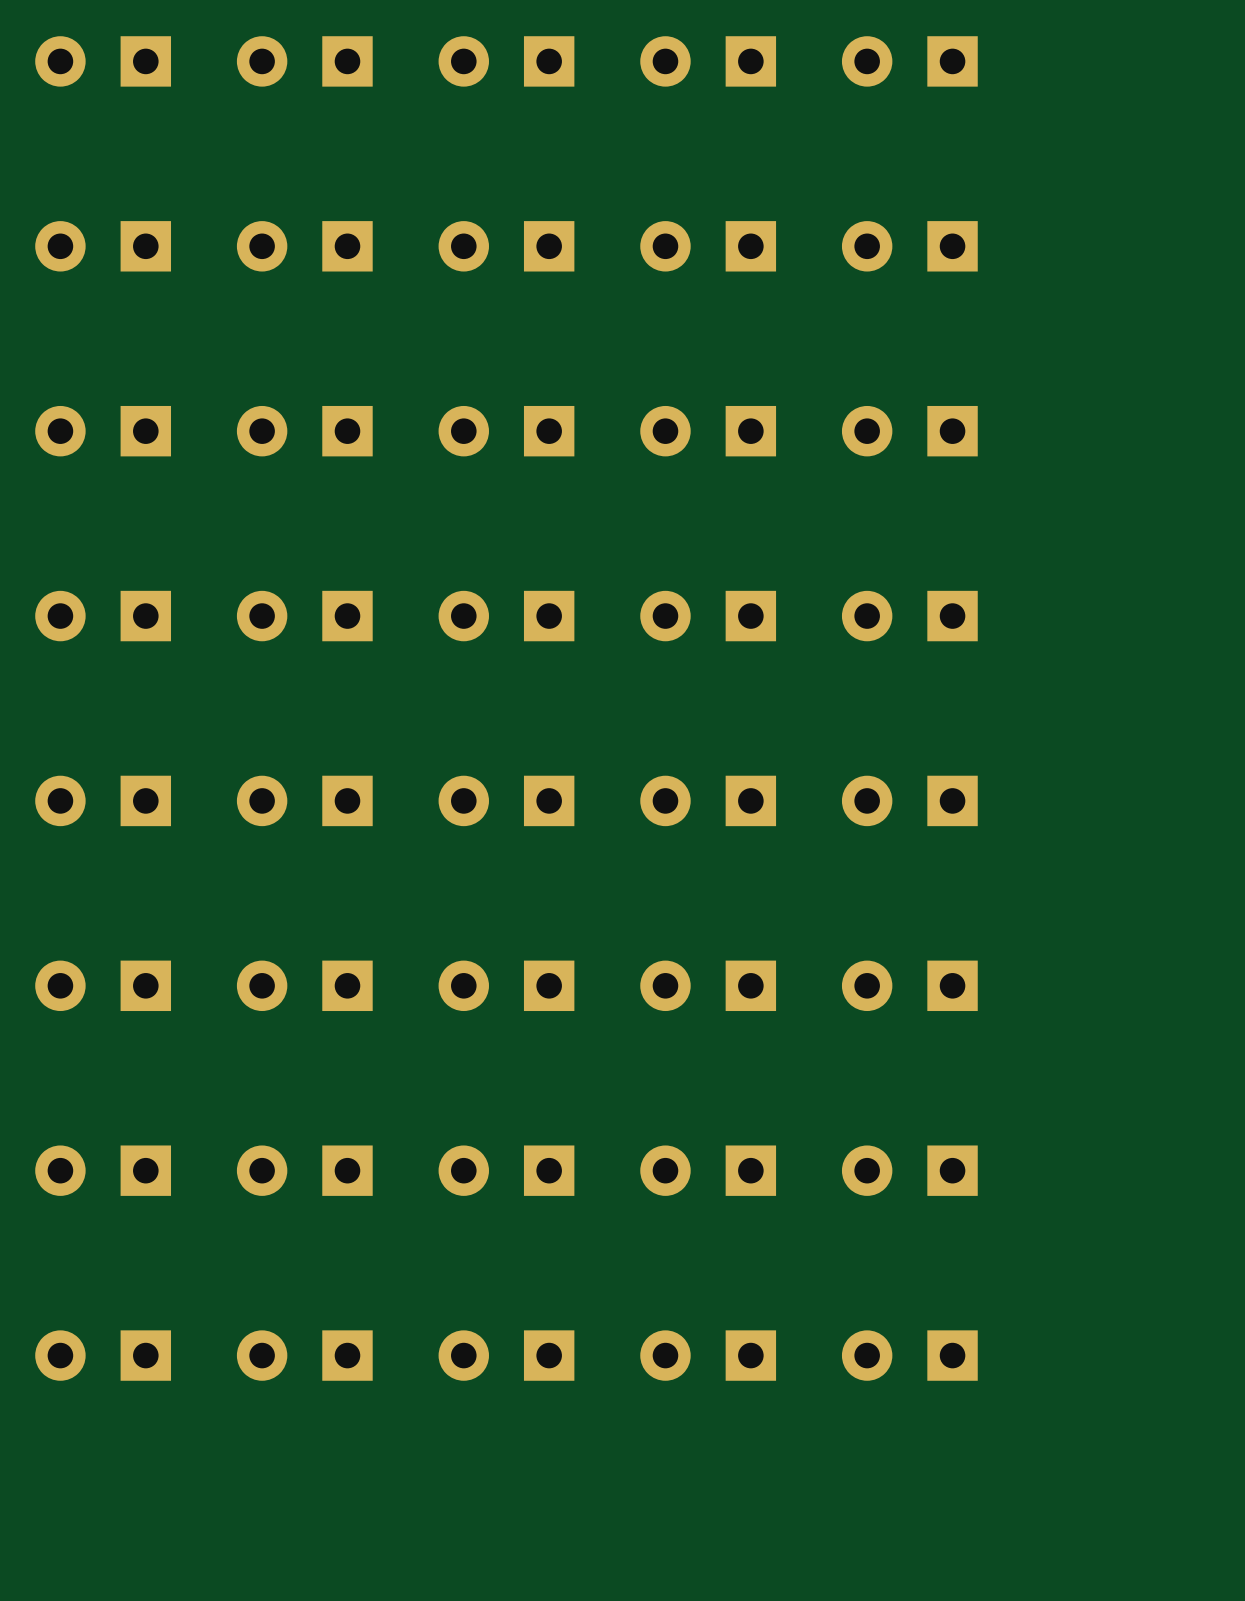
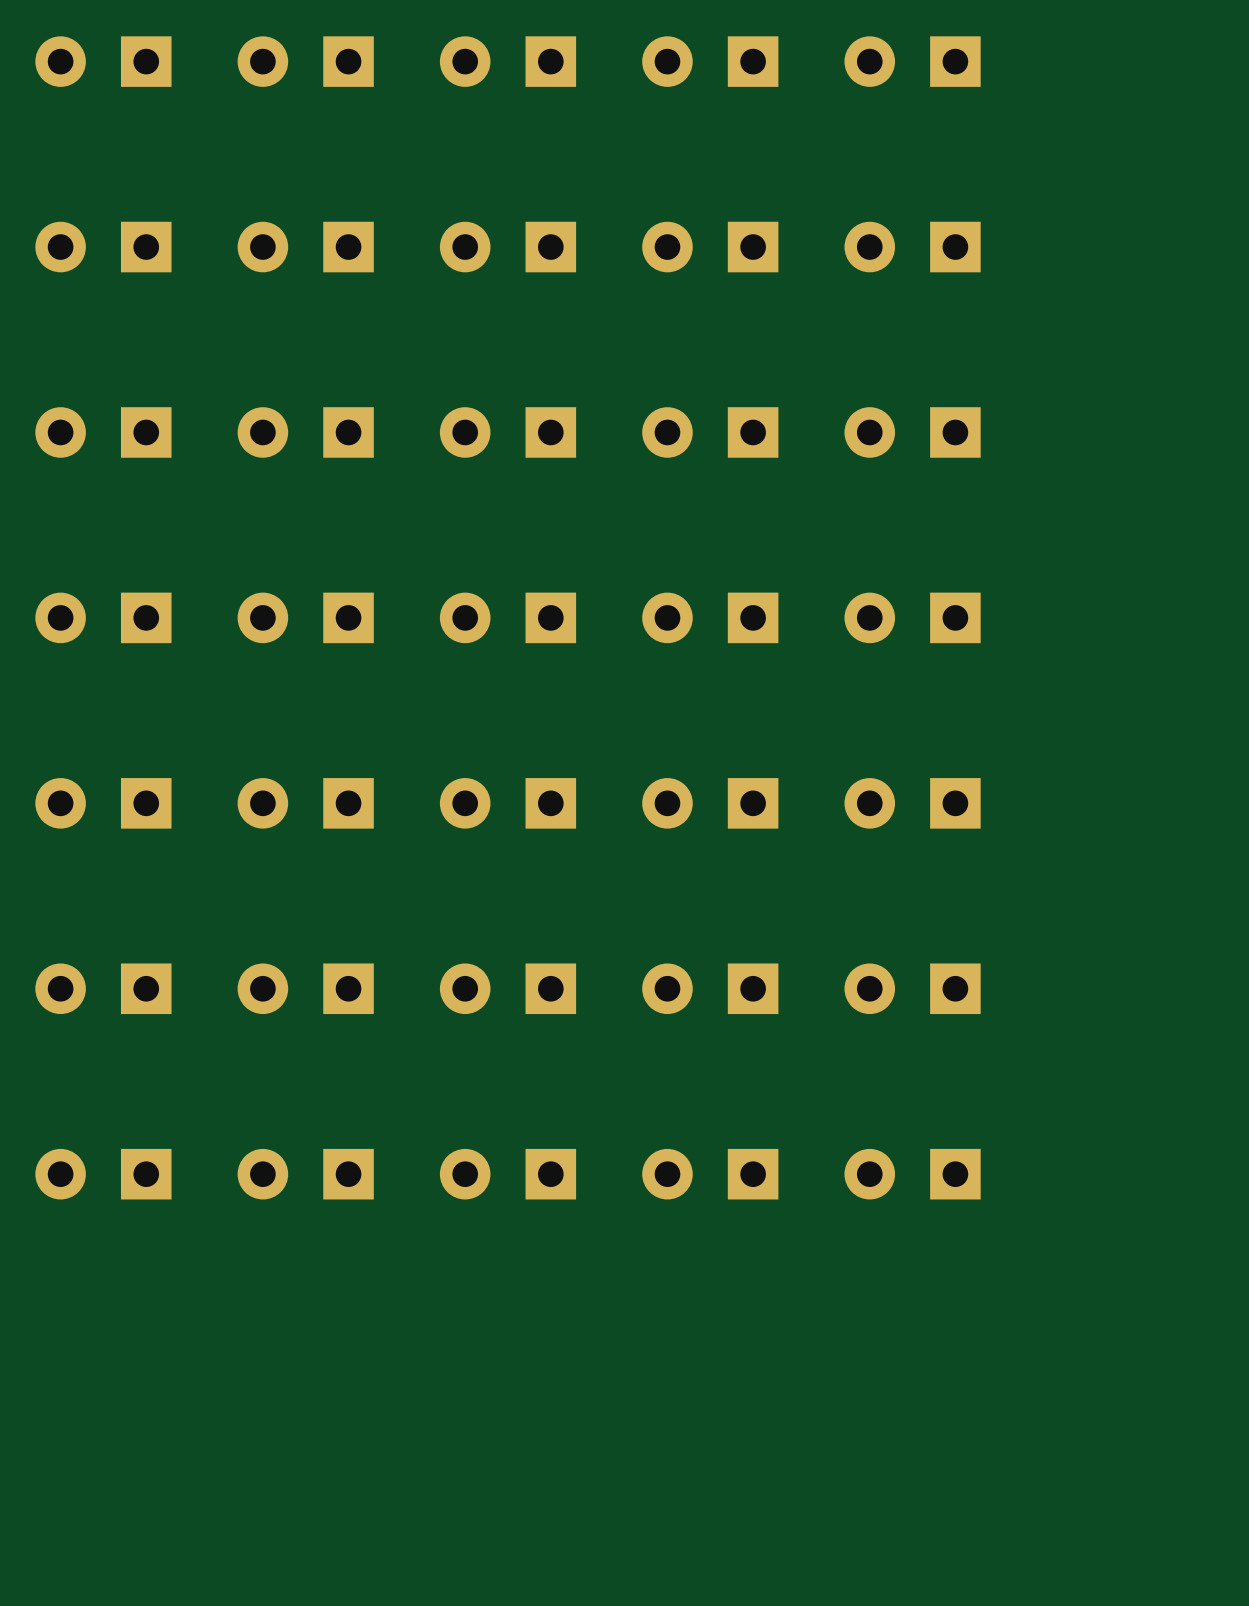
part: (103, 1355) -> none
part: (304, 1355) -> none
part: (506, 1355) -> none
part: (708, 1355) -> none
part: (909, 1355) -> none

